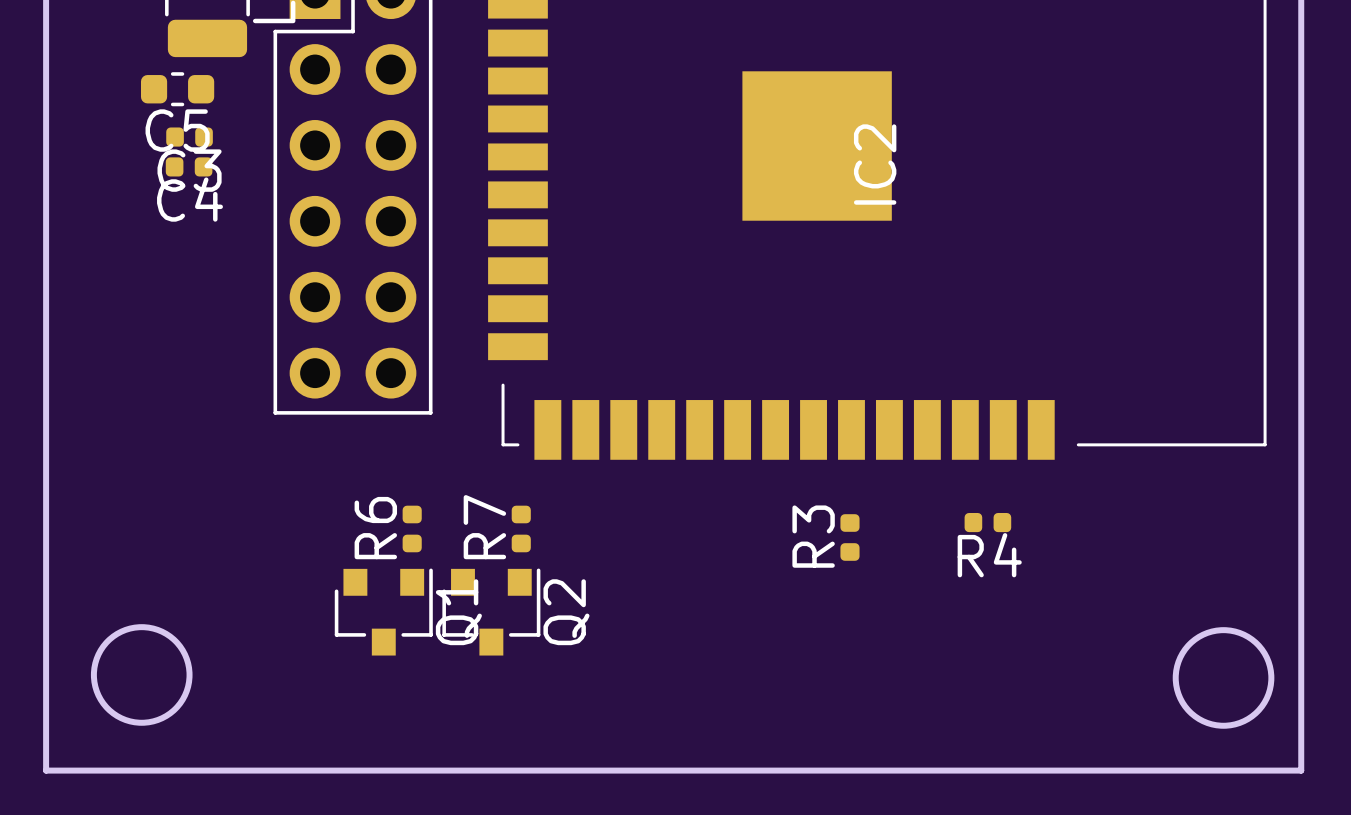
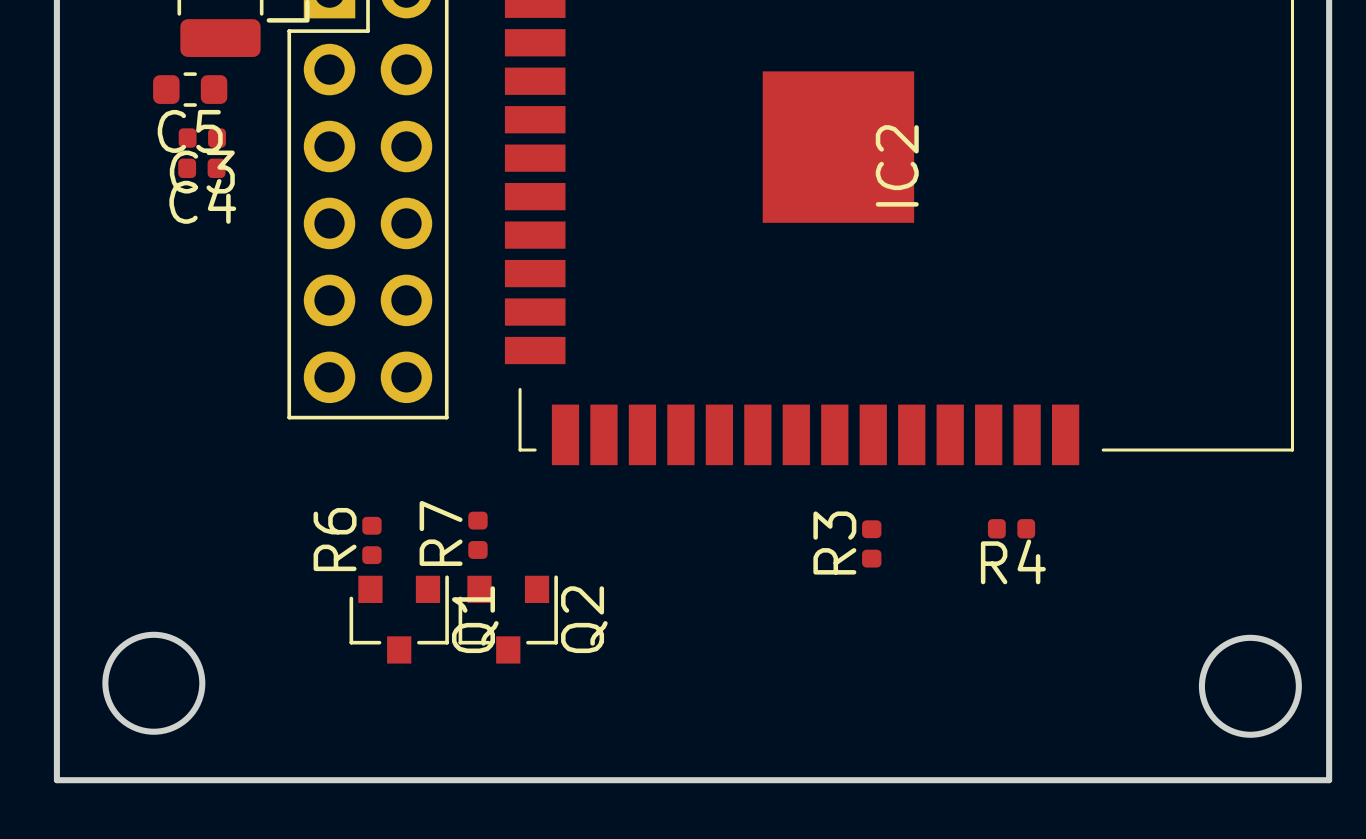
R6 position: (412, 528) -> (371, 540)
R7 position: (521, 528) -> (477, 535)

